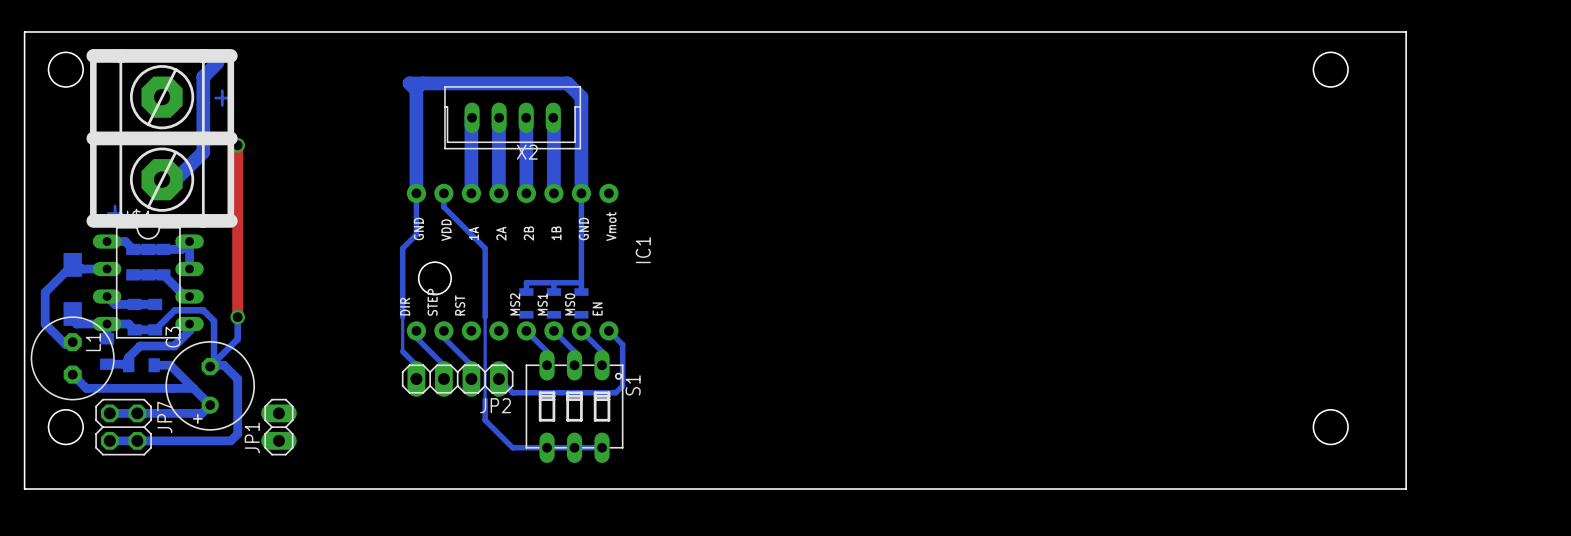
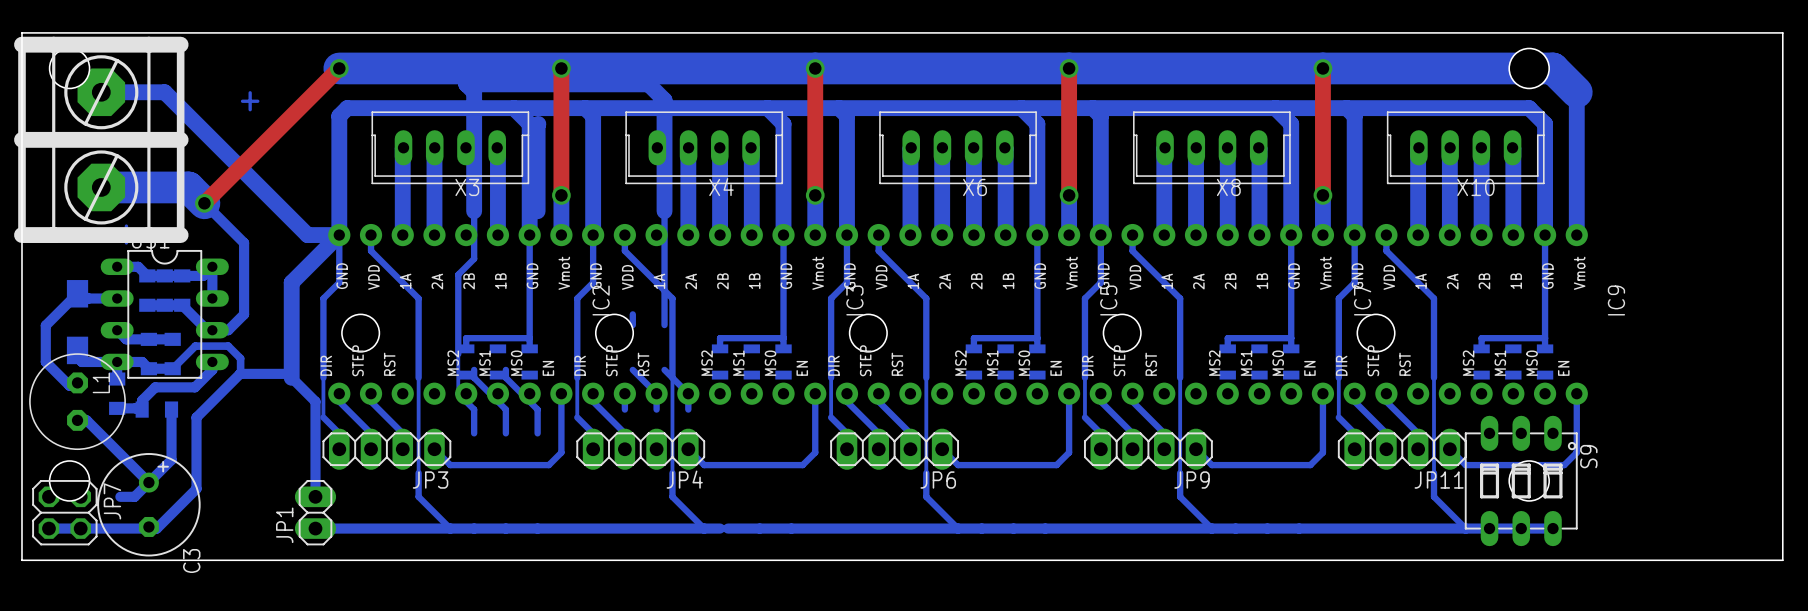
board edge: (24, 38) (24, 31) (1406, 31) (1406, 489) (24, 489) -> (21, 32) (1782, 32) (1782, 560) (21, 560) (21, 552)
bottom track: (217, 62) (203, 77) (203, 152) (175, 179) (162, 179) -> none
bottom track: none -> (339, 68) (1552, 68) (1576, 92) (1576, 235)
top track: none -> (339, 68) (204, 203)
via: none -> (339, 68)
top track: none -> (561, 68) (561, 195)
via: none -> (561, 68)
top track: none -> (815, 68) (815, 195)
via: none -> (815, 68)
top track: none -> (1069, 68) (1069, 195)
via: none -> (1069, 68)
top track: none -> (1322, 68) (1322, 195)
via: none -> (1322, 68)
bottom track: none -> (101, 92) (164, 92) (307, 235) (339, 235)
bottom track: none -> (513, 108) (529, 123) (529, 348)
bottom track: none -> (585, 108) (593, 116) (593, 282) (577, 298) (577, 417) (593, 433) (593, 449)
bottom track: none -> (767, 108) (783, 123) (783, 348)
bottom track: none -> (839, 108) (846, 116) (846, 282) (831, 298) (831, 417) (846, 433) (846, 449)
bottom track: none -> (1021, 108) (1037, 123) (1037, 348)
bottom track: none -> (1092, 108) (1100, 116) (1100, 282) (1084, 298) (1084, 417) (1100, 433) (1100, 449)
bottom track: none -> (1275, 108) (1291, 123) (1291, 348)
bottom track: none -> (1346, 108) (1354, 116) (1354, 282) (1338, 298) (1338, 417) (1354, 433) (1354, 449)
bottom track: (499, 117) (498, 193) -> (688, 147) (688, 235)
X2: (512, 117) -> none
bottom track: (526, 117) (526, 193) -> (719, 147) (720, 235)
bottom track: (553, 117) (553, 193) -> (751, 147) (751, 235)
part position: (162, 138) -> (101, 139)
bottom track: none -> (403, 147) (402, 235)
bottom track: none -> (434, 147) (434, 235)
X3: none -> (450, 147)
bottom track: none -> (497, 147) (497, 235)
X4: none -> (704, 147)
bottom track: none -> (911, 147) (910, 235)
bottom track: none -> (942, 147) (942, 235)
X6: none -> (958, 147)
bottom track: none -> (973, 147) (973, 235)
bottom track: none -> (1004, 147) (1005, 235)
bottom track: none -> (1165, 147) (1164, 235)
bottom track: none -> (1196, 147) (1196, 235)
X8: none -> (1211, 147)
bottom track: none -> (1227, 147) (1227, 235)
bottom track: none -> (1258, 147) (1259, 235)
bottom track: none -> (1418, 147) (1418, 235)
bottom track: none -> (1450, 147) (1449, 235)
X10: none -> (1465, 147)
bottom track: none -> (1481, 147) (1481, 235)
bottom track: none -> (1512, 147) (1513, 235)
top track: (237, 145) (237, 317) -> none
via: (237, 145) -> none
bottom track: none -> (101, 187) (188, 187) (244, 242) (244, 314) (228, 330) (212, 330)
bottom track: none -> (561, 195) (561, 235)
via: none -> (561, 195)
bottom track: none -> (815, 195) (815, 235)
via: none -> (815, 195)
bottom track: none -> (1069, 195) (1069, 235)
via: none -> (1069, 195)
bottom track: none -> (1322, 195) (1322, 235)
via: none -> (1322, 195)
via: none -> (204, 203)
bottom track: (443, 193) (443, 207) (485, 248) (485, 420) (512, 447) (602, 447) -> none
bottom track: none -> (339, 235) (339, 116) (347, 108) (1529, 108) (1545, 123) (1545, 348)
bottom track: none -> (339, 235) (291, 282) (291, 377)
bottom track: none -> (339, 235) (339, 282) (323, 298) (323, 417) (339, 433) (339, 449)
bottom track: none -> (371, 235) (371, 250) (418, 298) (418, 496) (450, 528)
bottom track: none -> (624, 235) (624, 250) (672, 298) (672, 496) (704, 528)
bottom track: none -> (878, 235) (878, 250) (926, 298) (926, 496) (958, 528)
bottom track: none -> (1132, 235) (1132, 250) (1180, 298) (1180, 496) (1211, 528)
bottom track: none -> (1386, 235) (1386, 250) (1434, 298) (1434, 496) (1465, 528)
IC1: (512, 262) -> none
IC2: none -> (450, 314)
bottom track: (581, 282) (526, 282) (526, 292) -> (783, 338) (720, 338) (720, 348)
IC3: none -> (704, 314)
IC5: none -> (958, 314)
IC7: none -> (1211, 314)
IC9: none -> (1465, 314)
bottom track: none -> (529, 338) (466, 338) (466, 348)
part: (526, 303) -> none
part: (553, 303) -> none
part: (581, 303) -> none
bottom track: none -> (1037, 338) (973, 338) (973, 348)
bottom track: none -> (1291, 338) (1227, 338) (1227, 348)
bottom track: none -> (1545, 338) (1481, 338) (1481, 348)
via: (237, 317) -> none
bottom track: (237, 318) (237, 339) (210, 366) (223, 365) (237, 379) (237, 434) (230, 440) (122, 440) -> none
part: none -> (466, 361)
part: none -> (497, 361)
part: none -> (529, 361)
part: none -> (720, 361)
part: none -> (751, 361)
part: none -> (783, 361)
part: none -> (973, 361)
part: none -> (1005, 361)
part: none -> (1037, 361)
part: none -> (1227, 361)
part: none -> (1259, 361)
part: none -> (1291, 361)
part: none -> (1481, 361)
part: none -> (1513, 361)
part: none -> (1545, 361)
bottom track: (526, 330) (547, 351) -> none
bottom track: (608, 330) (622, 344) (622, 385) (615, 392) (512, 392) (498, 379) -> none
bottom track: (214, 333) (214, 362) -> (240, 373) (196, 417) (196, 488) (156, 528) (48, 528)
bottom track: none -> (240, 373) (287, 373) (291, 369) (291, 377)
bottom track: none -> (291, 377) (315, 401) (315, 496)
bottom track: none -> (339, 393) (339, 401) (371, 433) (371, 449)
bottom track: none -> (371, 393) (371, 401) (402, 433) (402, 449)
bottom track: none -> (561, 393) (561, 452) (548, 465) (450, 465) (434, 449)
bottom track: none -> (593, 393) (593, 401) (624, 433) (624, 449)
bottom track: none -> (815, 393) (815, 452) (802, 465) (704, 465) (688, 449)
bottom track: none -> (846, 393) (846, 401) (878, 433) (878, 449)
bottom track: none -> (878, 393) (878, 401) (910, 433) (910, 449)
bottom track: none -> (1069, 393) (1069, 452) (1056, 465) (958, 465) (942, 449)
bottom track: none -> (1100, 393) (1100, 401) (1132, 433) (1132, 449)
bottom track: none -> (1132, 393) (1132, 401) (1164, 433) (1164, 449)
bottom track: none -> (1322, 393) (1322, 452) (1310, 465) (1211, 465) (1196, 449)
bottom track: none -> (1354, 393) (1354, 401) (1386, 433) (1386, 449)
bottom track: none -> (1386, 393) (1386, 401) (1418, 433) (1418, 449)
bottom track: none -> (1576, 393) (1576, 452) (1564, 465) (1465, 465) (1449, 449)
bottom track: (154, 365) (170, 365) (210, 405) (201, 413) (109, 413) -> (171, 409) (171, 459) (134, 496)
bottom track: (72, 374) (86, 388) (193, 388) -> (77, 420) (86, 420) (148, 482)
bottom track: none -> (474, 425) (474, 433)
bottom track: none -> (505, 425) (505, 433)
JP2: (457, 379) -> none
bottom track: none -> (537, 425) (537, 433)
C3 rotation: 0° (210, 385) -> 180° (148, 504)
C3 position: (210, 385) -> (148, 504)
JP3: none -> (386, 449)
JP4: none -> (640, 449)
JP6: none -> (894, 449)
JP9: none -> (1148, 449)
JP11: none -> (1402, 449)
S1: (574, 406) -> none
JP7 position: (123, 427) -> (64, 512)
JP1 position: (278, 427) -> (315, 512)
S9: none -> (1521, 480)
bottom track: none -> (315, 528) (1552, 528)

